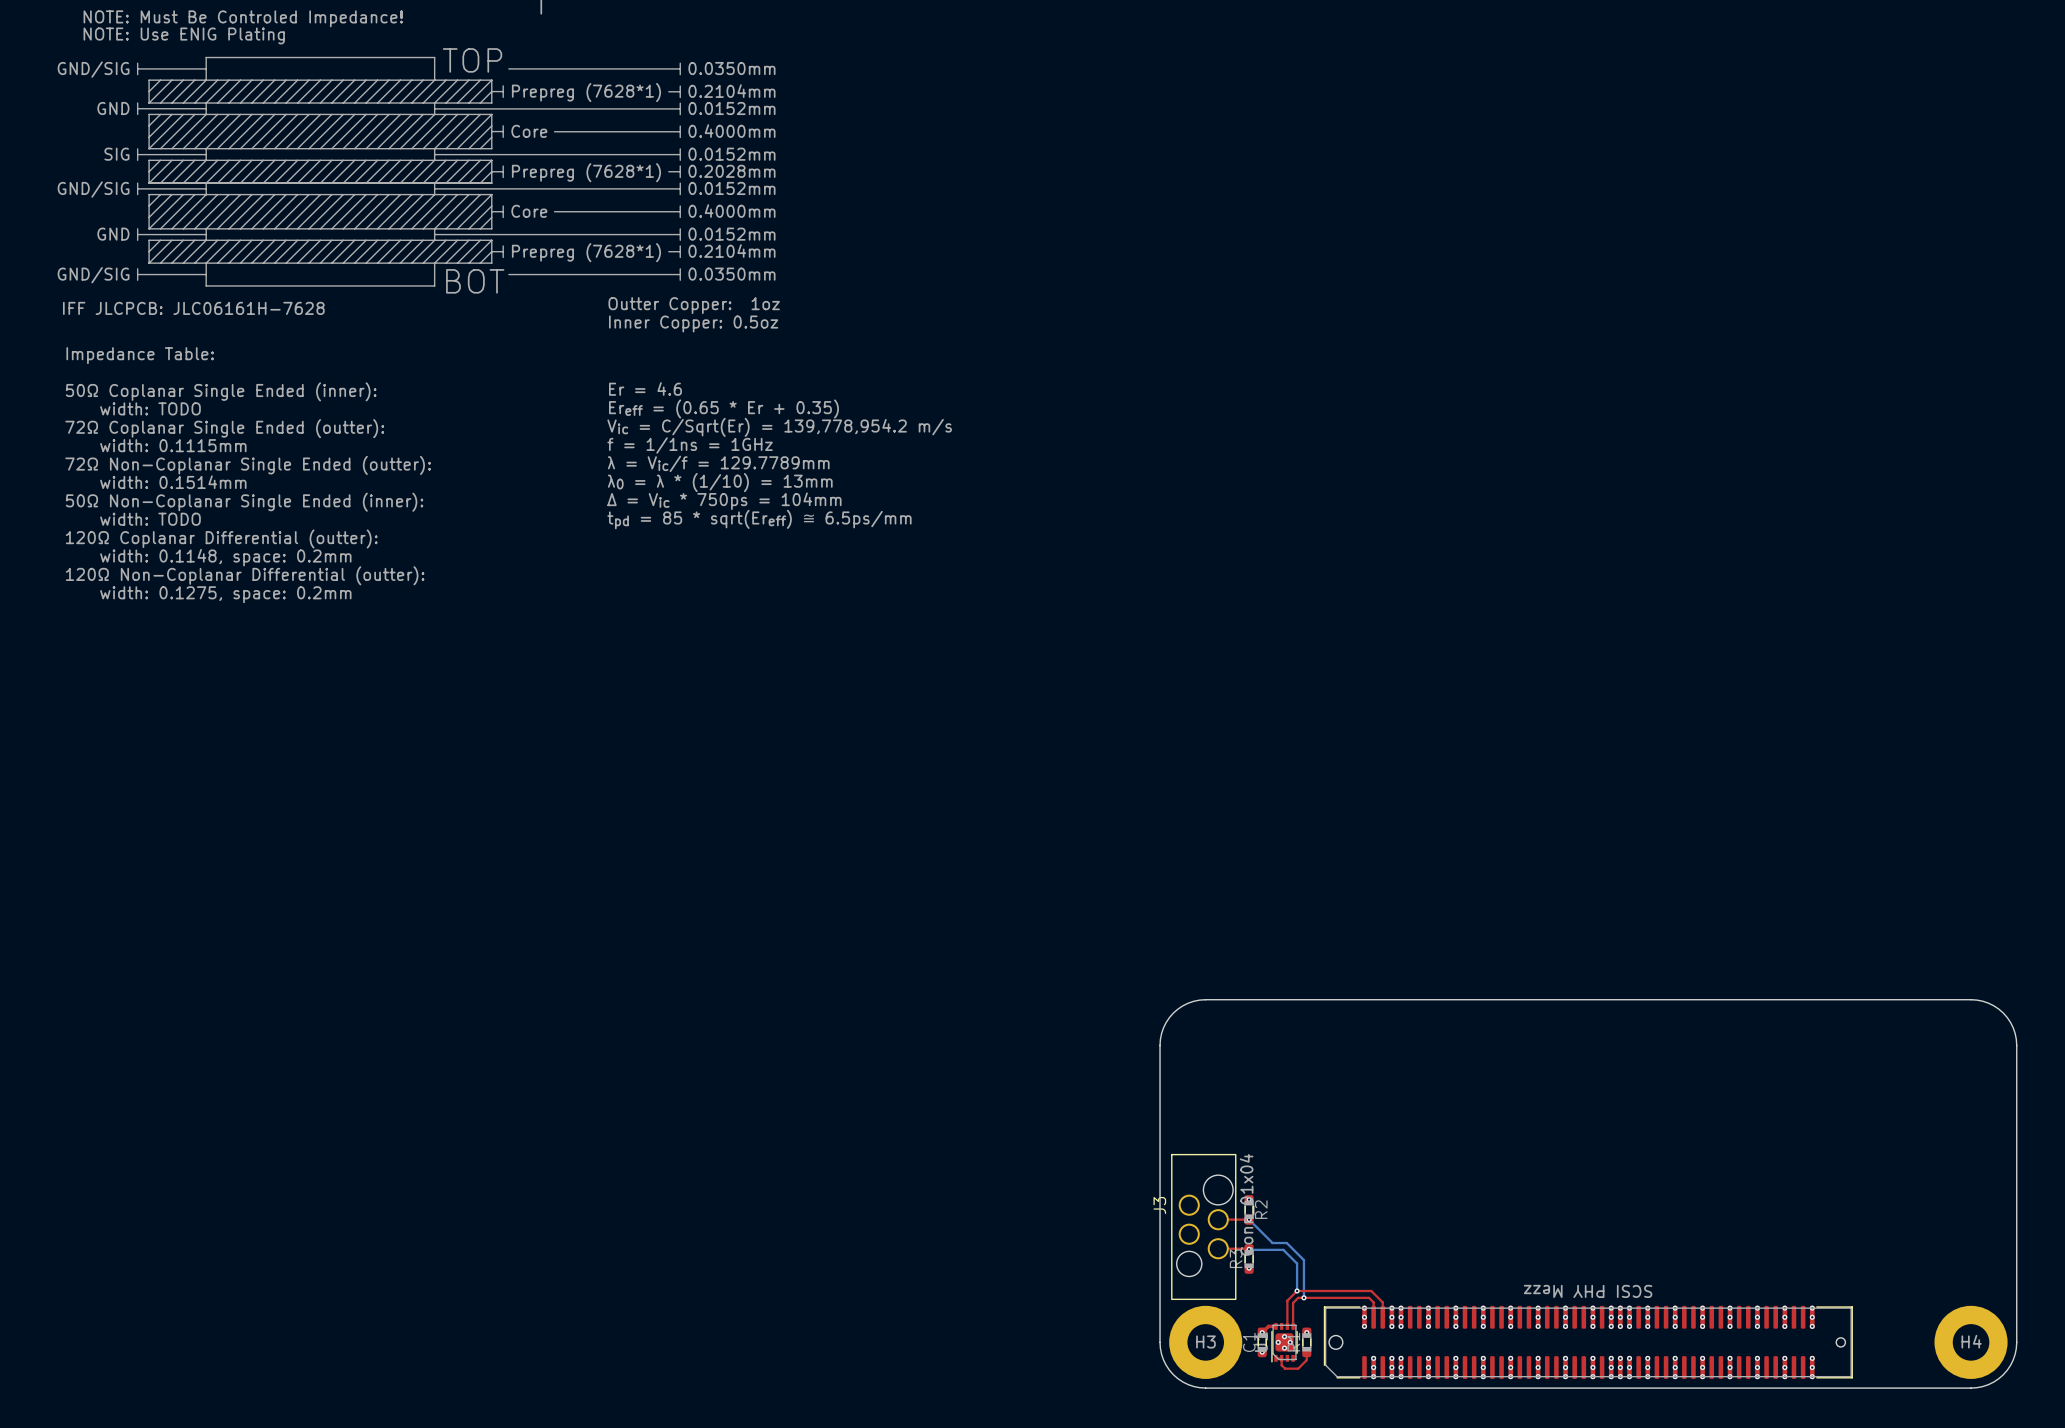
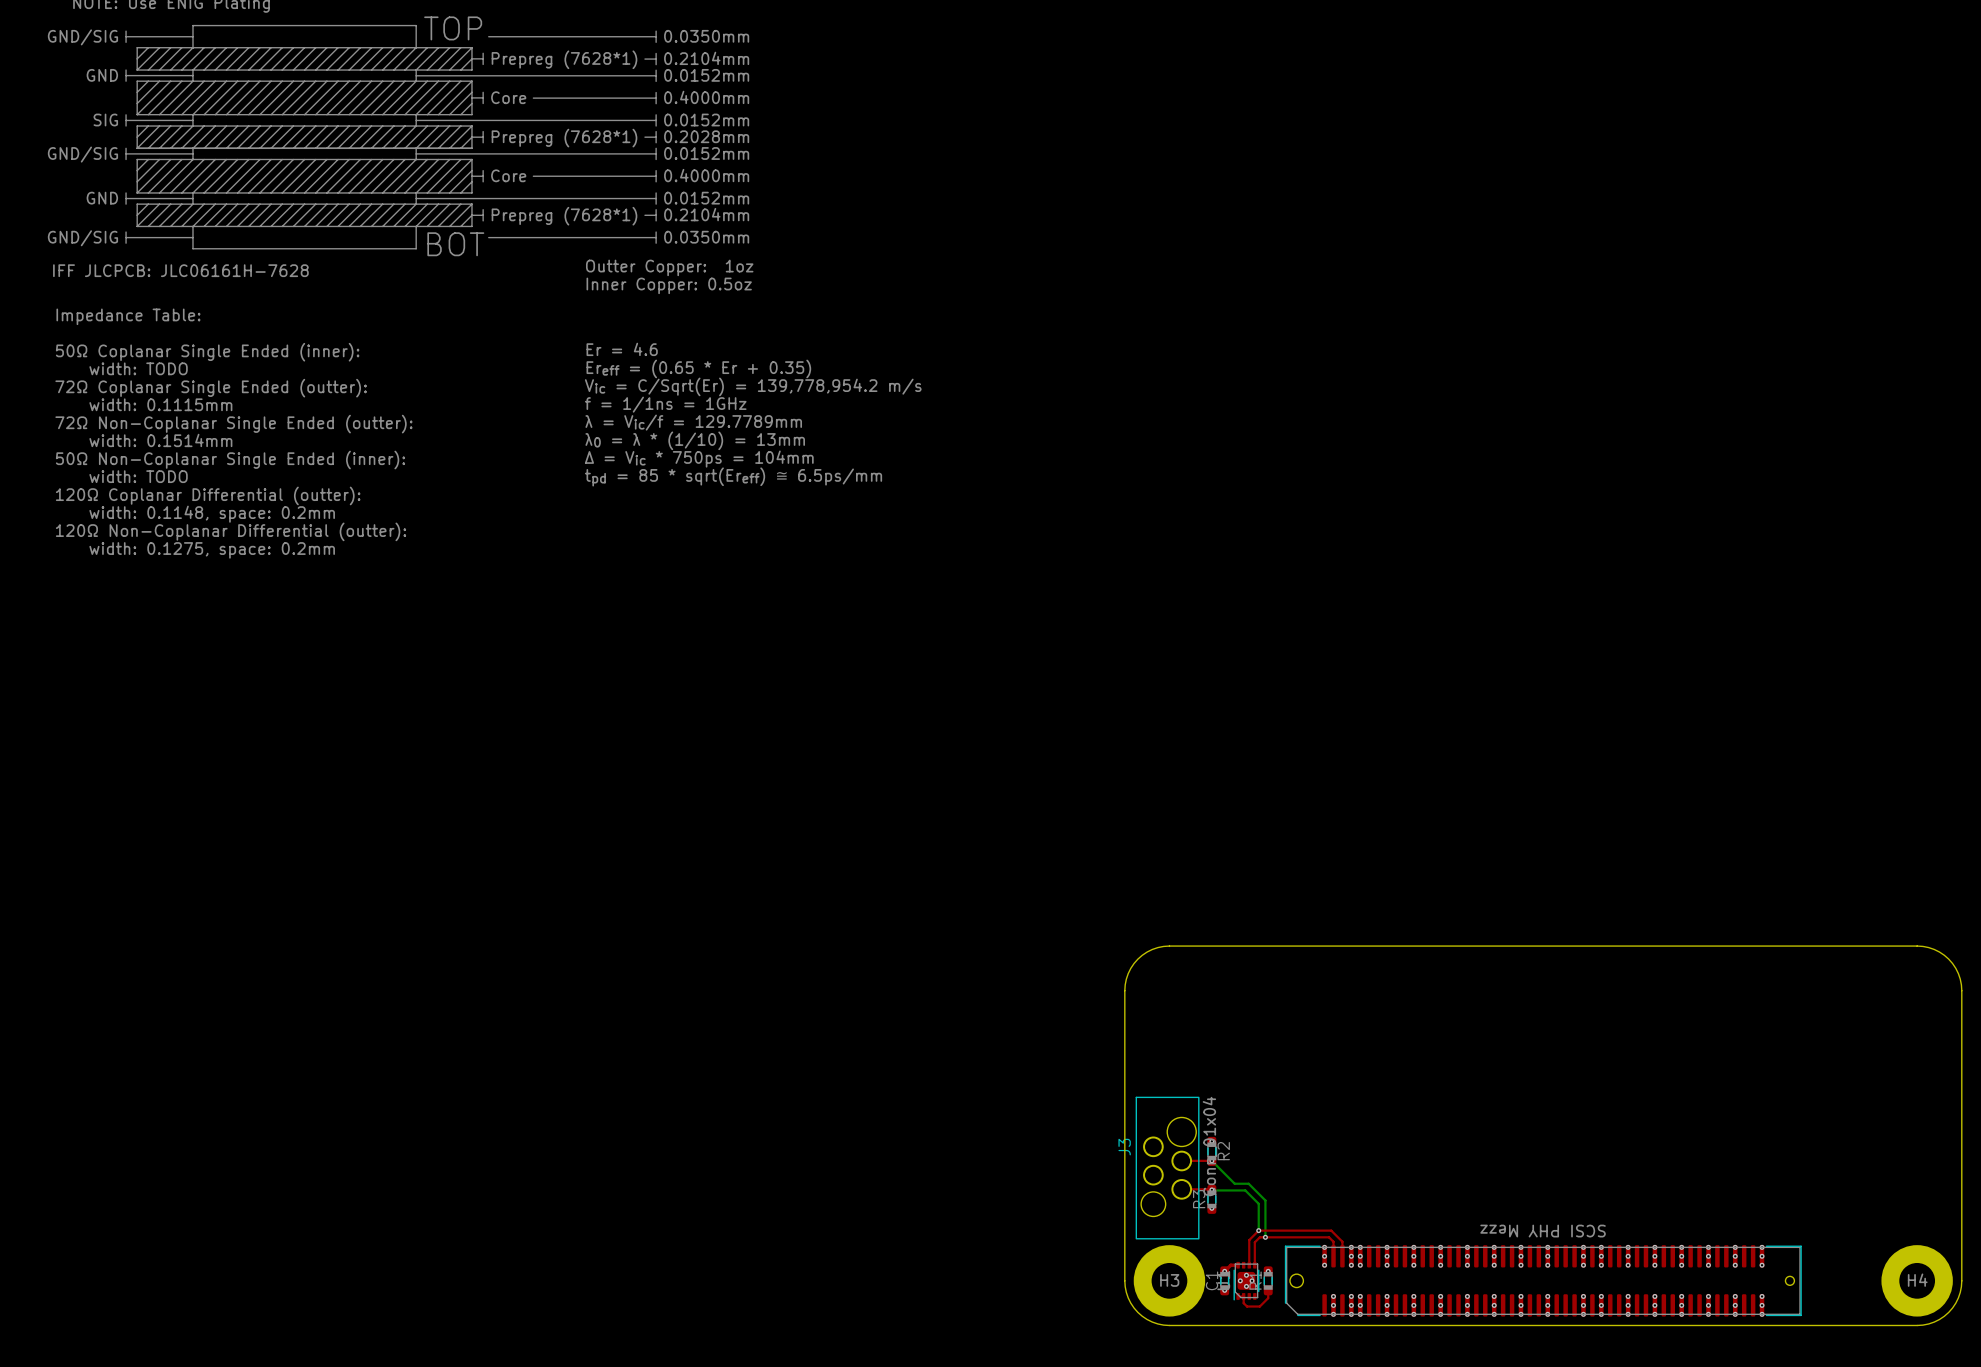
via: (1611, 1308) -> none
via: (1620, 1308) -> none
via: (1611, 1317) -> none
via: (1620, 1317) -> none
via: (1611, 1326) -> none
via: (1620, 1326) -> none
via: (1611, 1358) -> none
via: (1620, 1358) -> none
via: (1611, 1367) -> none
via: (1620, 1367) -> none
via: (1611, 1376) -> none
via: (1620, 1376) -> none

